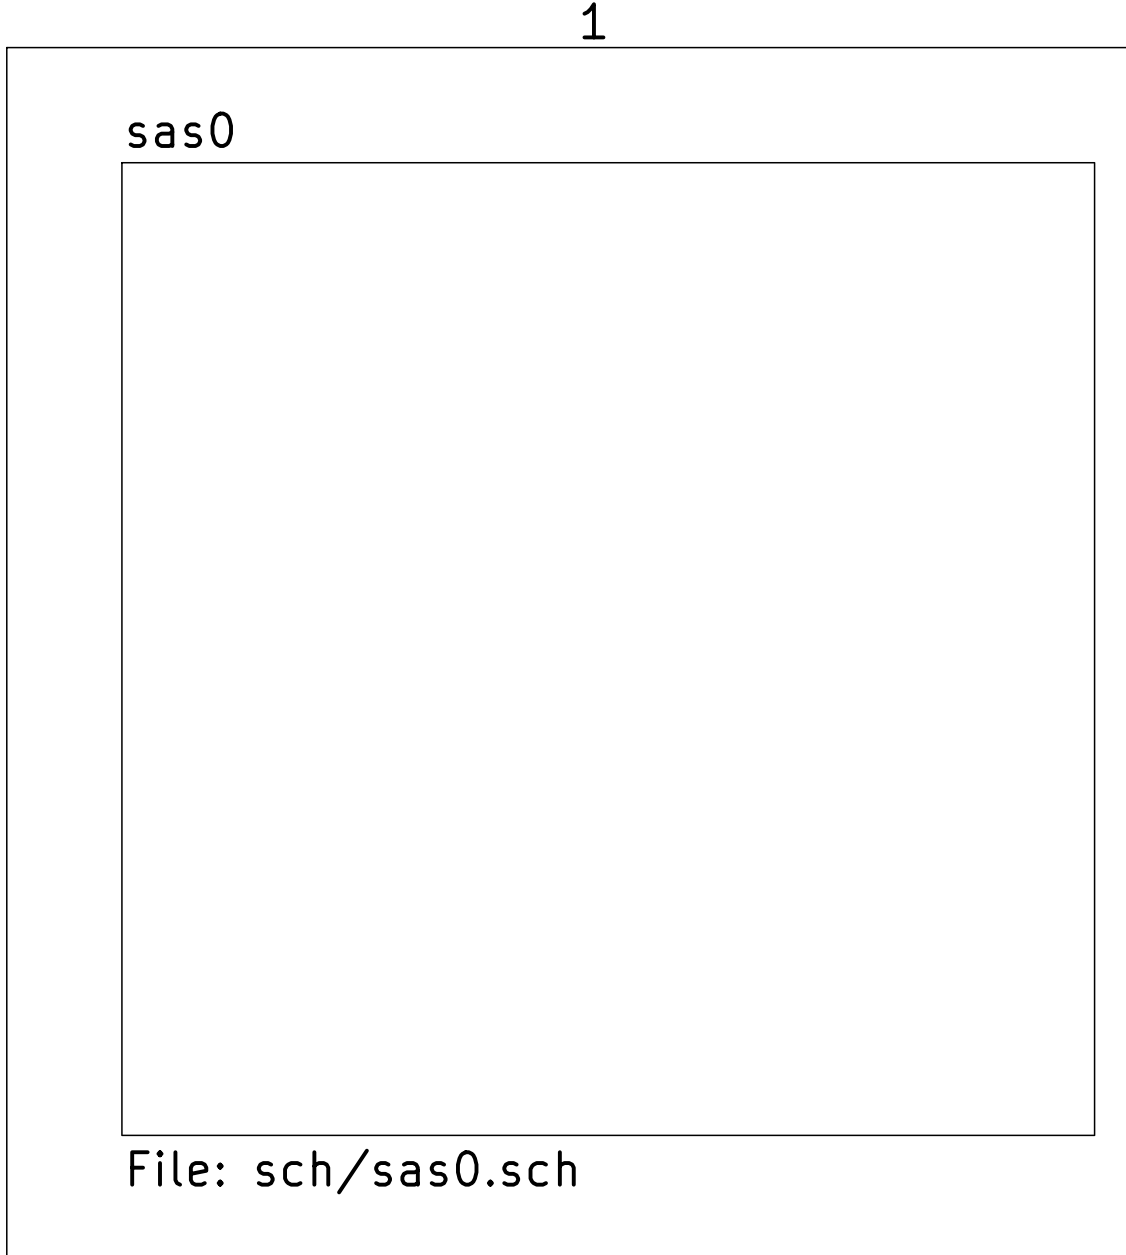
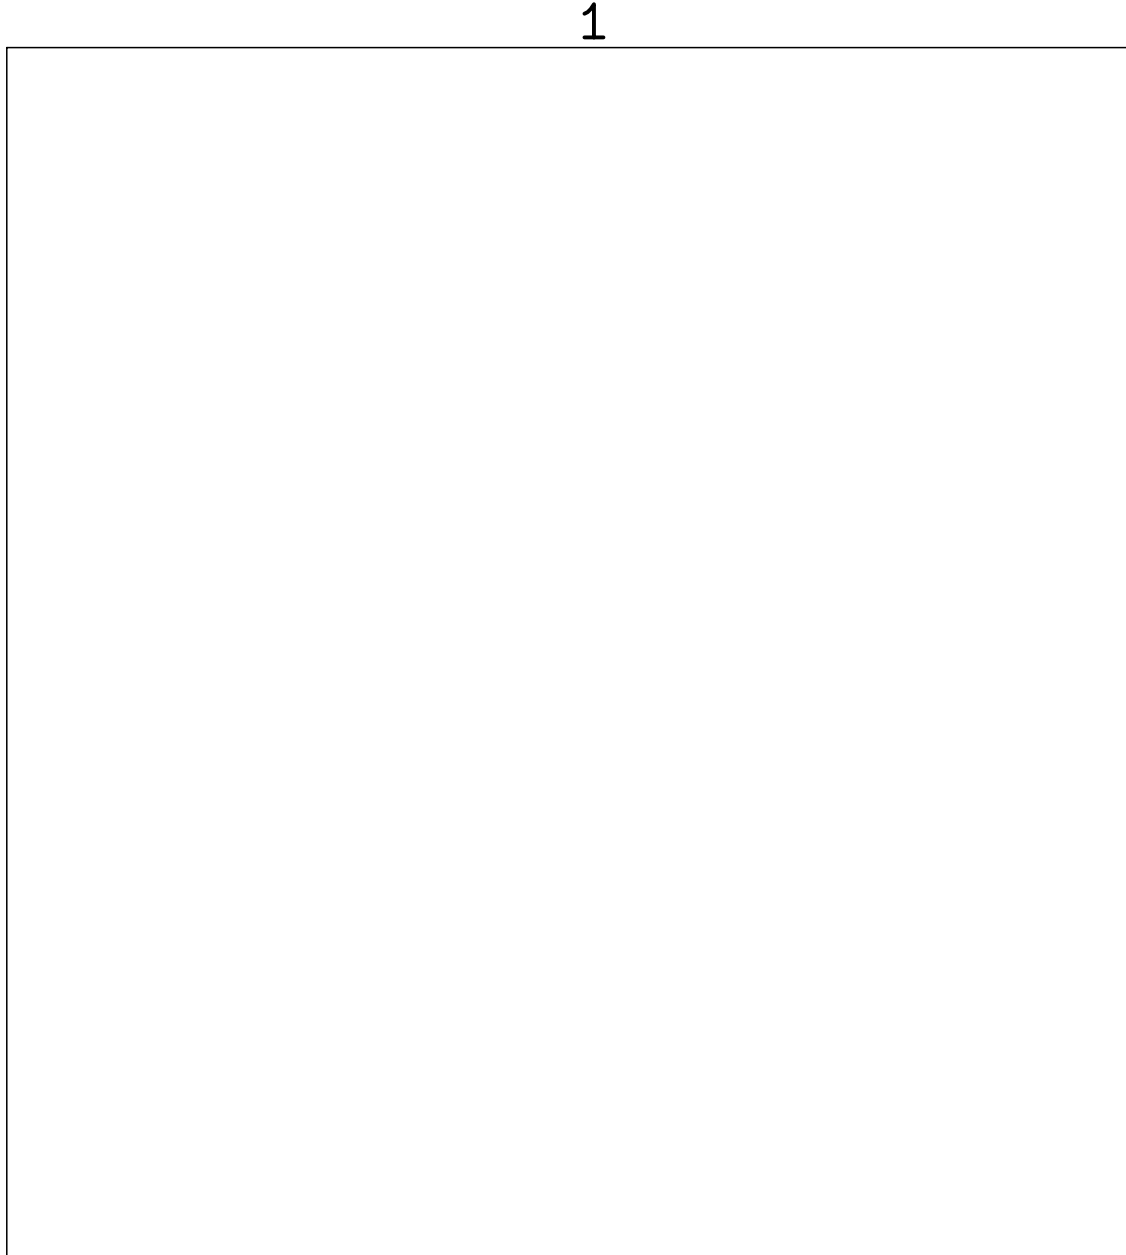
sheet sas0: File: sch/sas0.sch (608, 649) -> none

